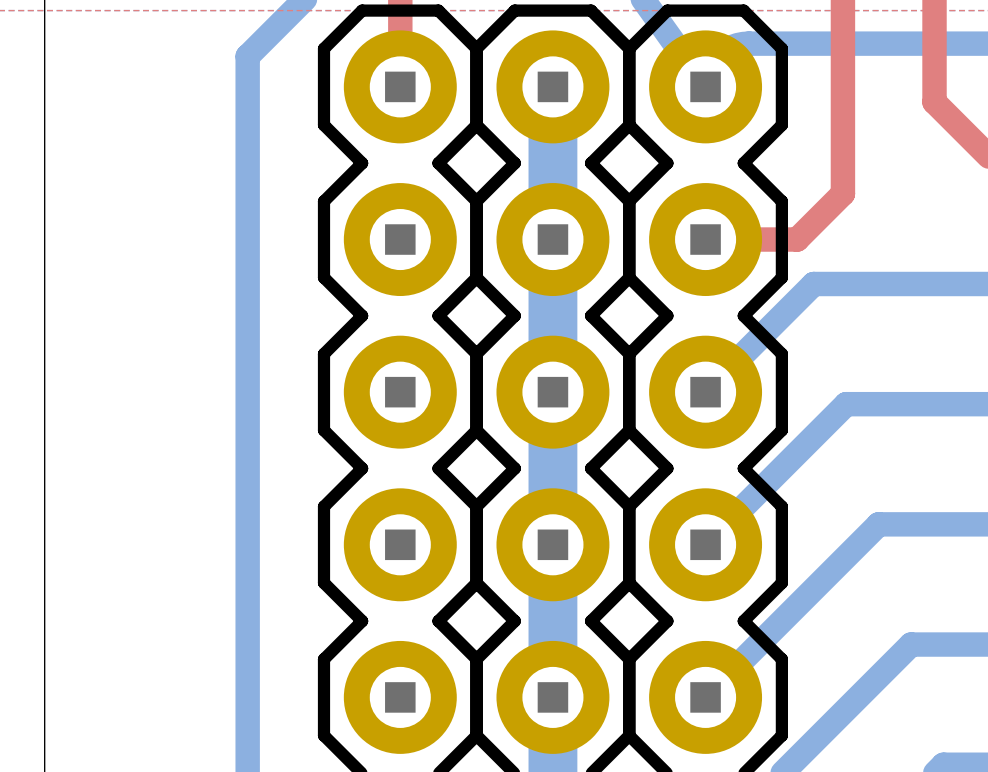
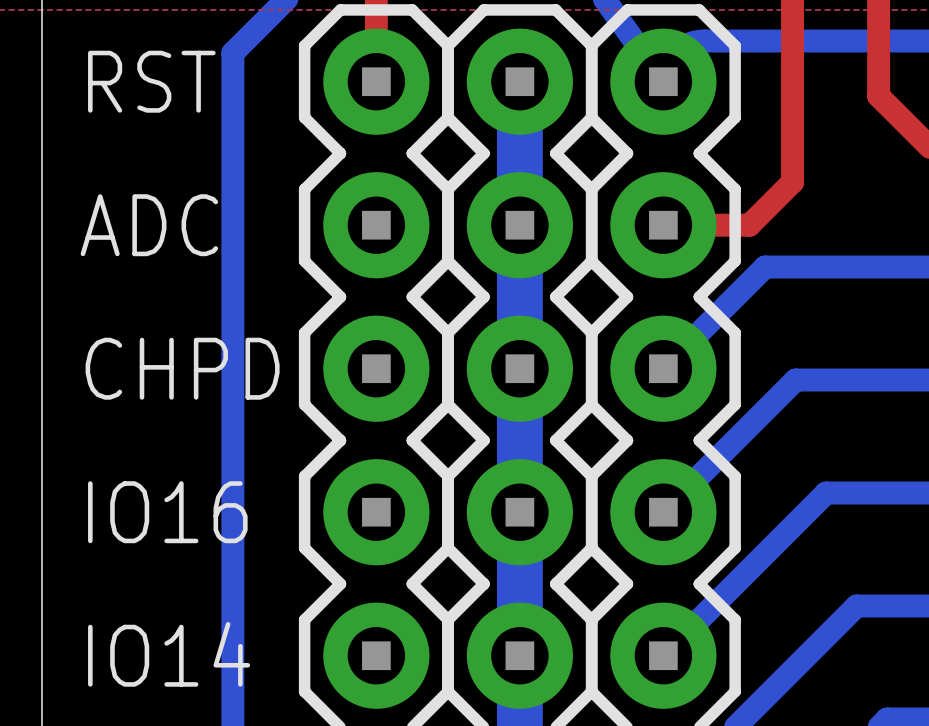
text: none -> RST (151, 81)
text: none -> ADC (149, 225)
text: none -> CHPD (182, 368)
text: none -> IO16 (167, 512)
text: none -> IO14 (169, 654)

